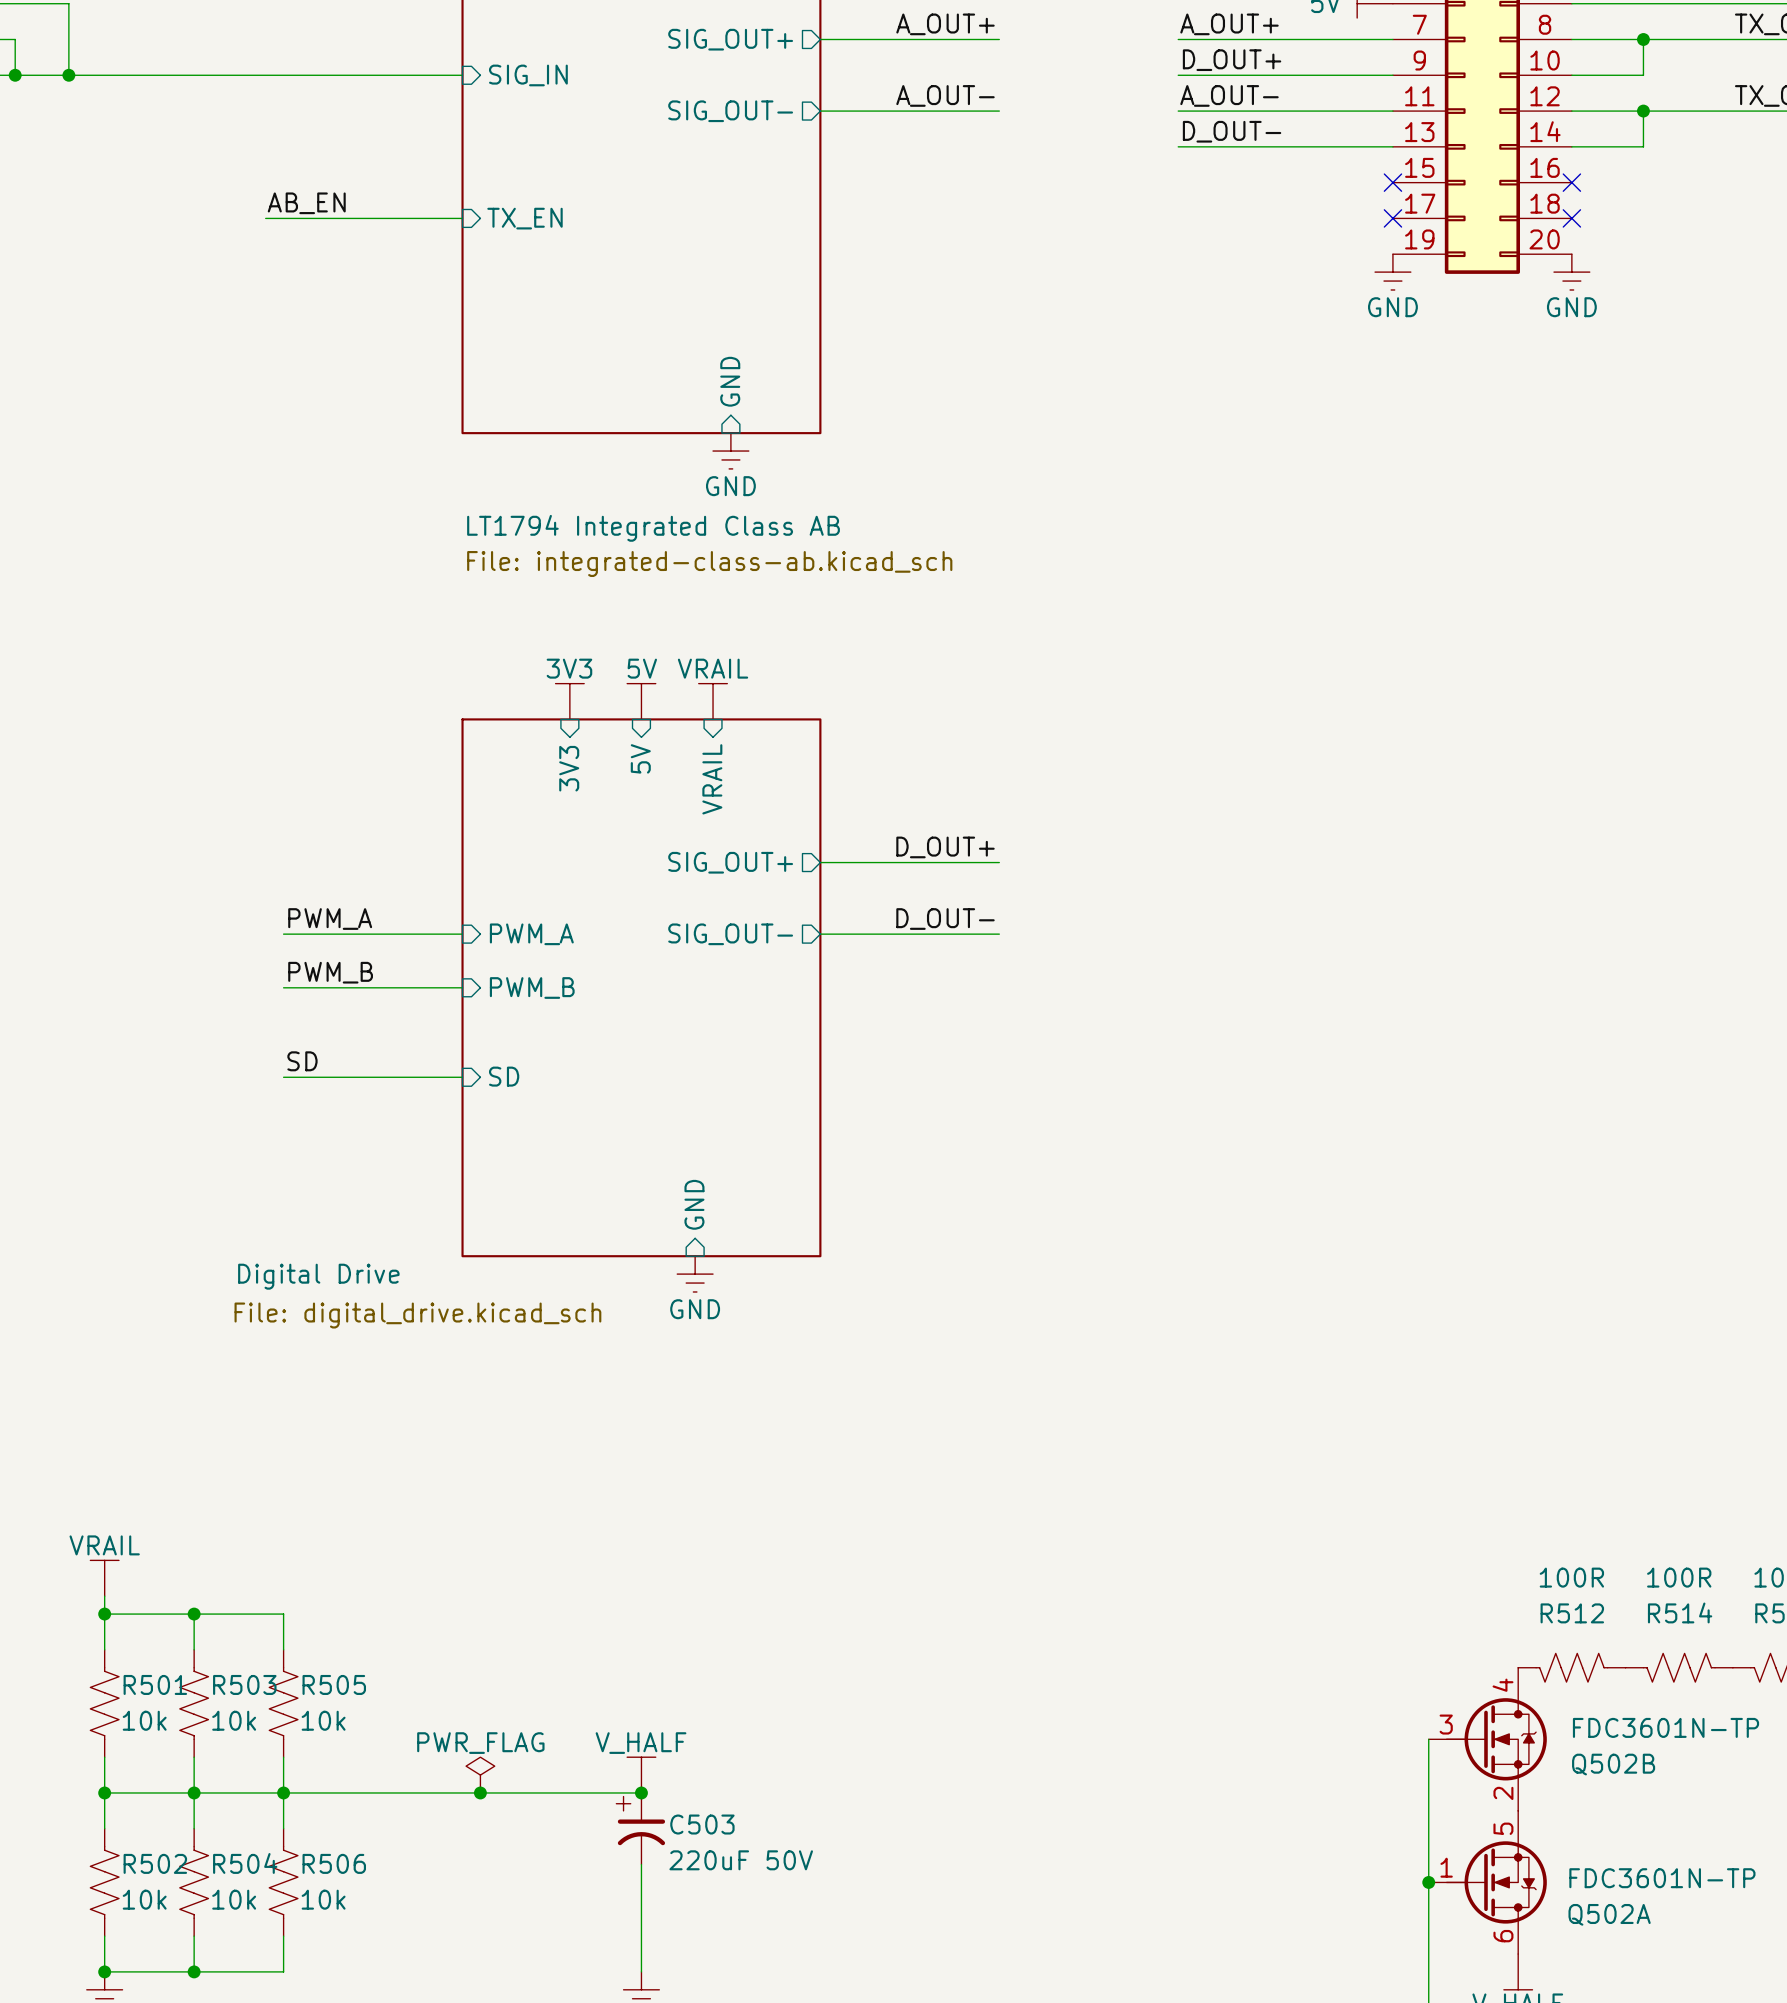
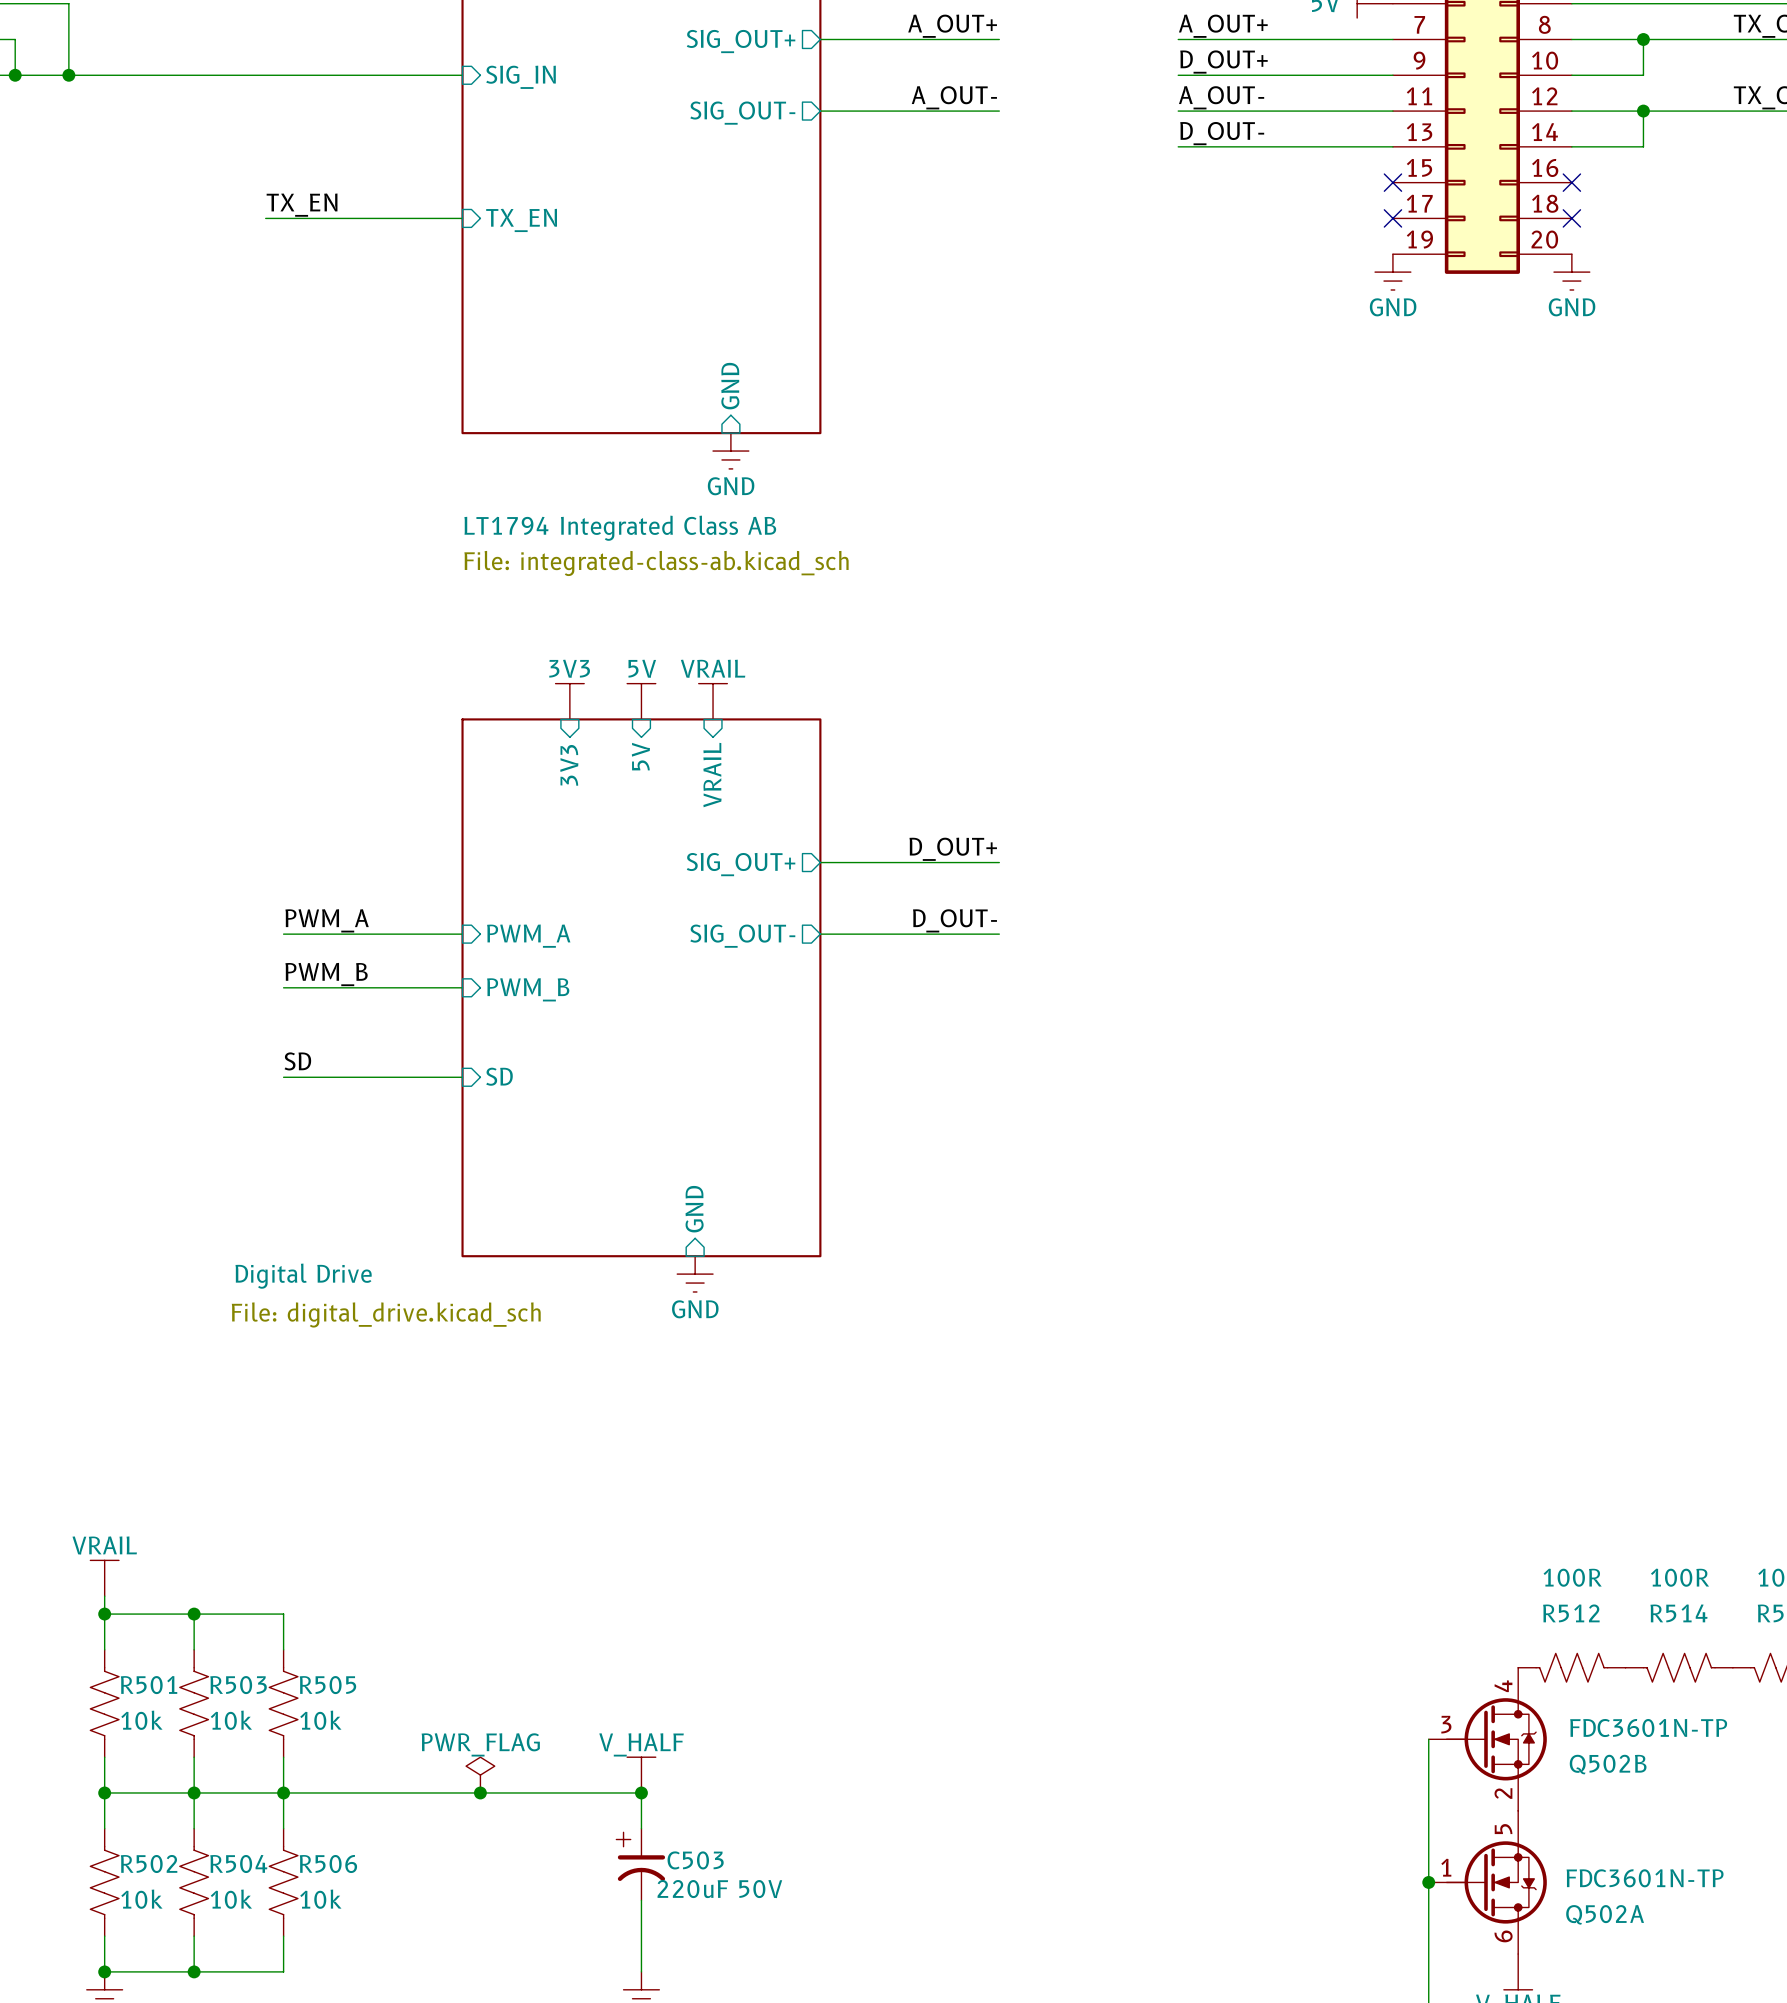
label: AB_EN (306, 203) -> TX_EN (302, 205)
C503 position: (640, 1828) -> (640, 1864)
C503 value position: 220uF 50V (741, 1860) -> 220uF 50V (719, 1889)

